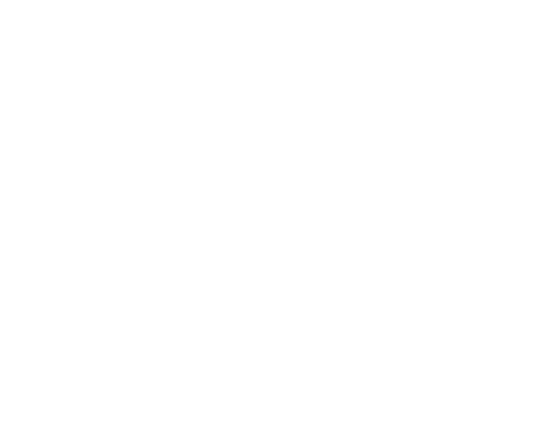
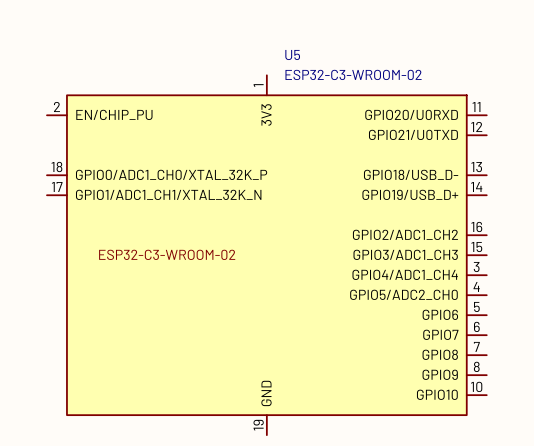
U5: none -> ESP32-C3-WROOM-02 (266, 255)

